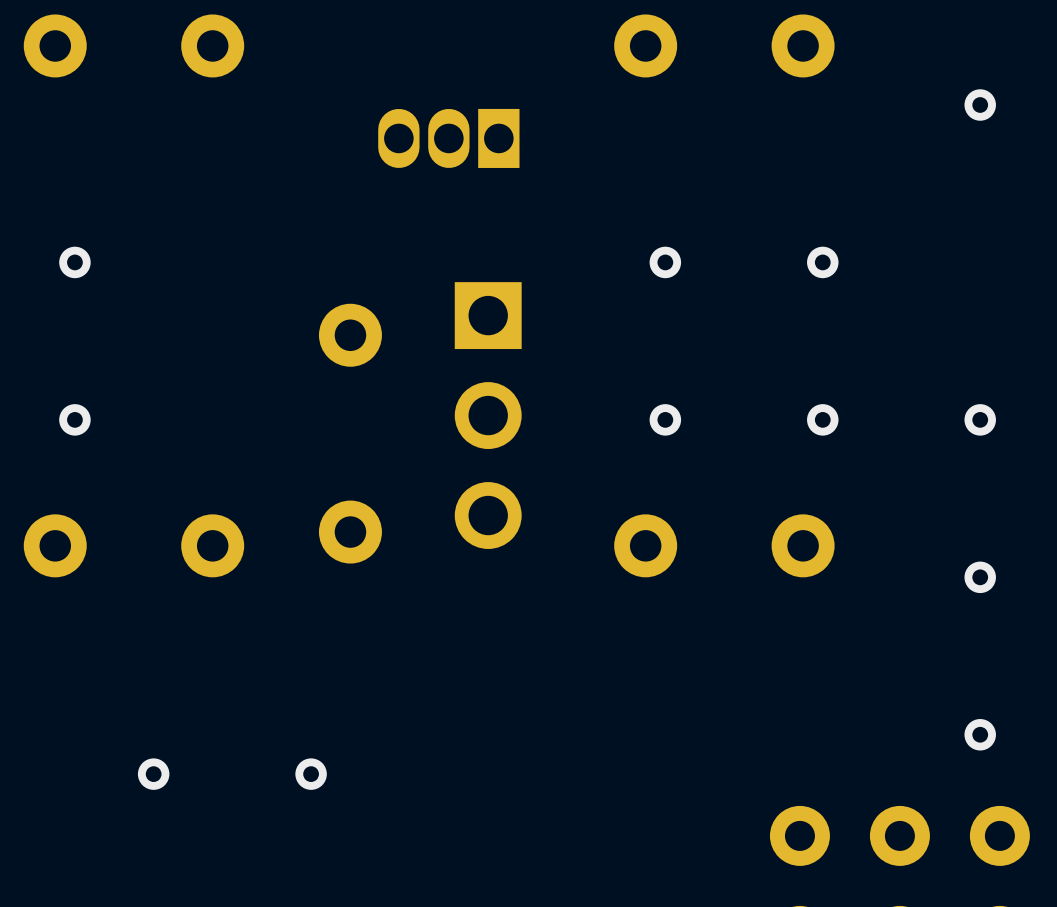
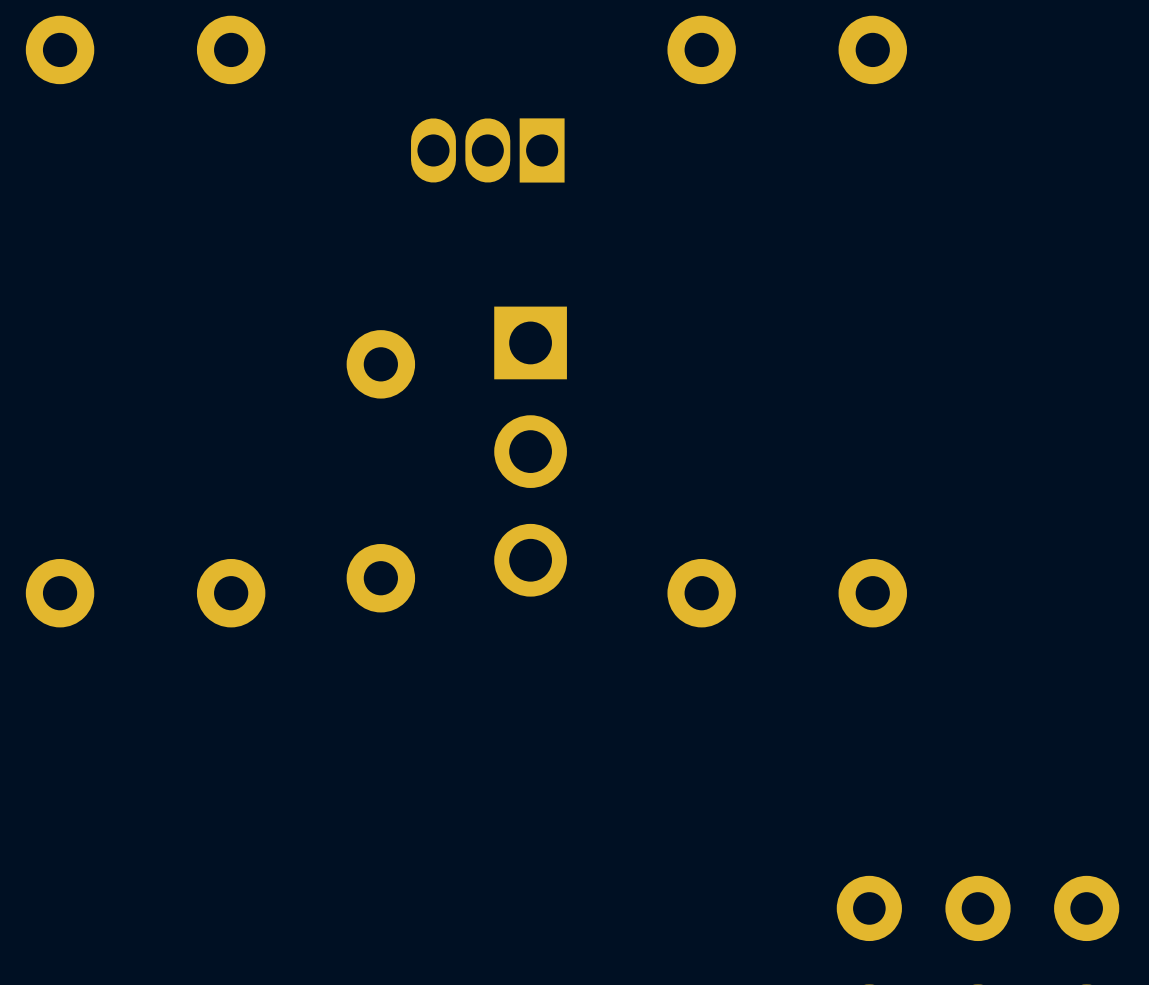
via: (980, 105) -> none
via: (74, 262) -> none
via: (665, 262) -> none
via: (822, 262) -> none
via: (74, 419) -> none
via: (665, 419) -> none
via: (822, 419) -> none
via: (980, 419) -> none
via: (980, 577) -> none
via: (980, 734) -> none
via: (153, 774) -> none
via: (311, 774) -> none

